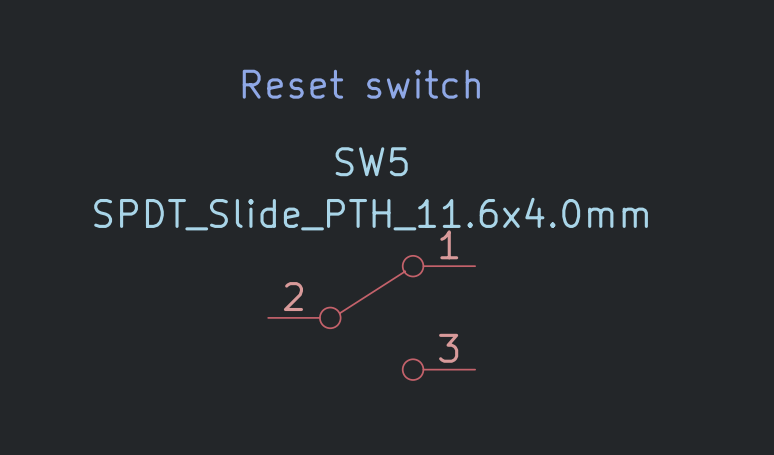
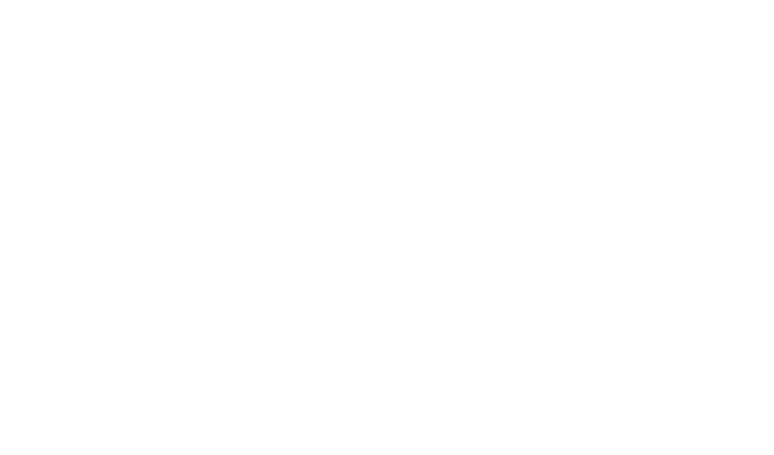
text: Reset switch (361, 84) -> none
SW5: SPDT_Slide_PTH_11.6x4.0mm (371, 317) -> none

